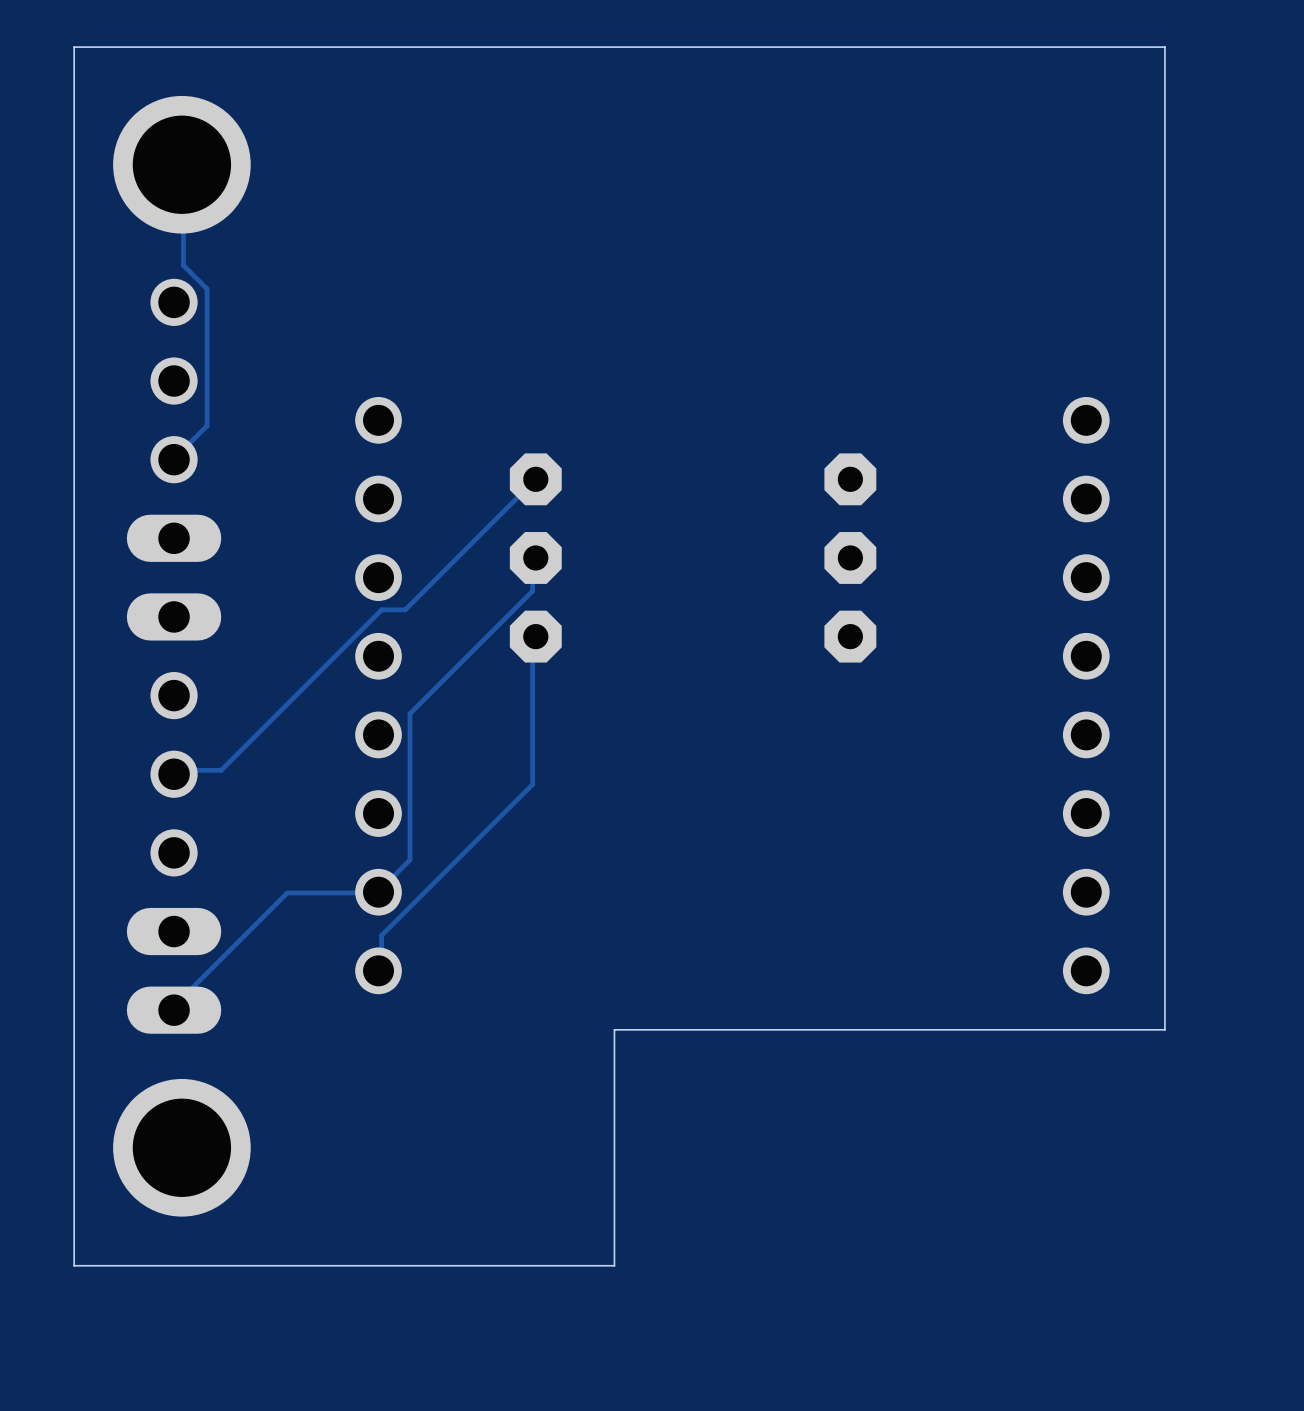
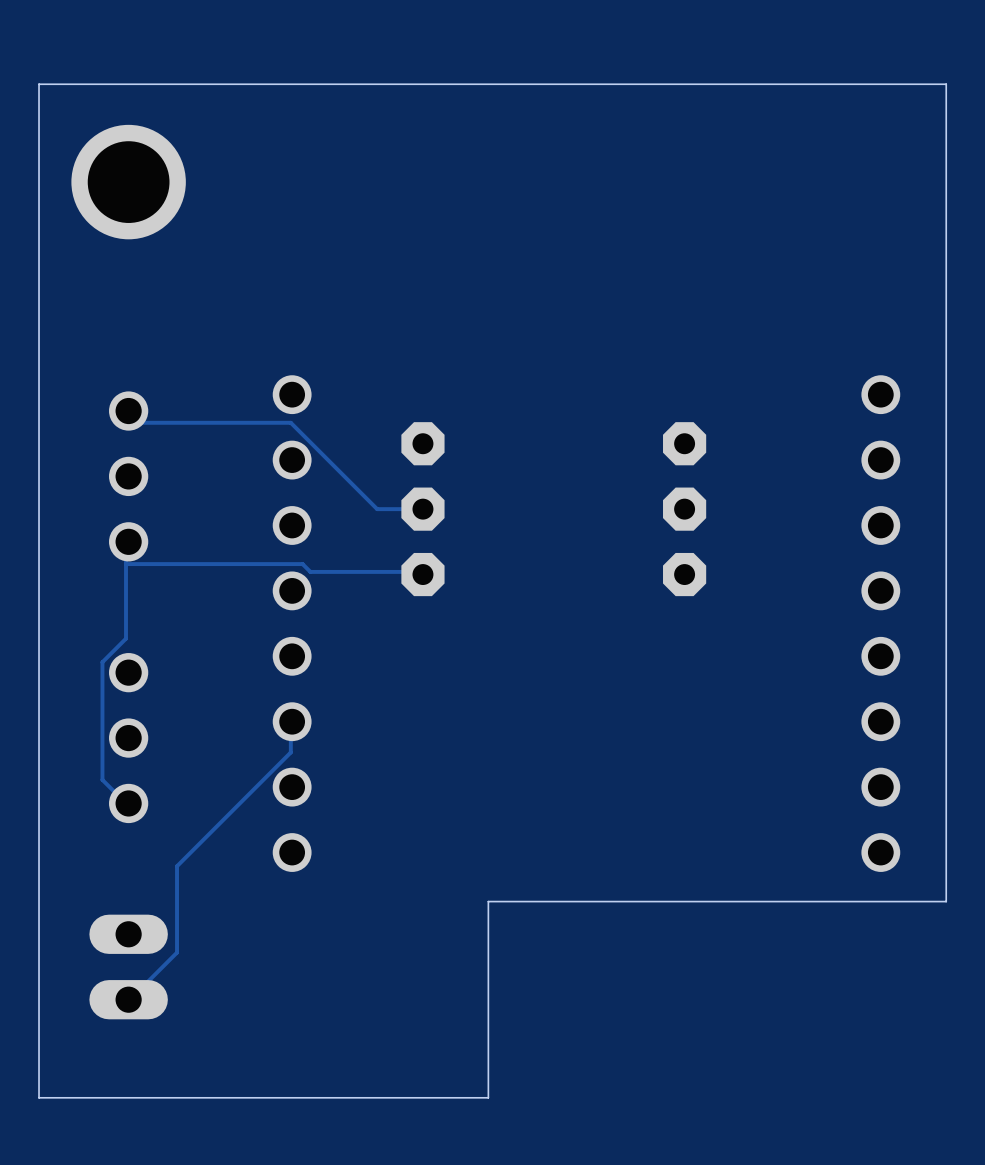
track: (181, 164) (183, 166) (183, 265) (207, 289) (207, 425) (174, 459) -> none
part: (174, 381) -> none
track: (535, 479) (405, 609) (381, 609) (221, 770) (174, 770) (174, 774) -> none
part: none -> (128, 476)
track: (532, 557) (532, 591) (409, 713) (409, 859) (376, 892) (287, 892) (174, 1006) (174, 1010) -> (420, 509) (377, 509) (290, 422) (141, 422) (128, 411)
part: (174, 577) -> none
track: none -> (128, 541) (126, 544) (126, 638) (102, 662) (102, 779) (126, 803) (128, 803)
track: (535, 636) (532, 638) (532, 784) (381, 935) (381, 968) (378, 970) -> (422, 574) (420, 571) (310, 571) (302, 564) (126, 564)
part position: (174, 774) -> (128, 738)
track: none -> (292, 721) (290, 752) (177, 866) (177, 952) (128, 999)
part position: (174, 970) -> (128, 966)
part: (181, 1147) -> none

